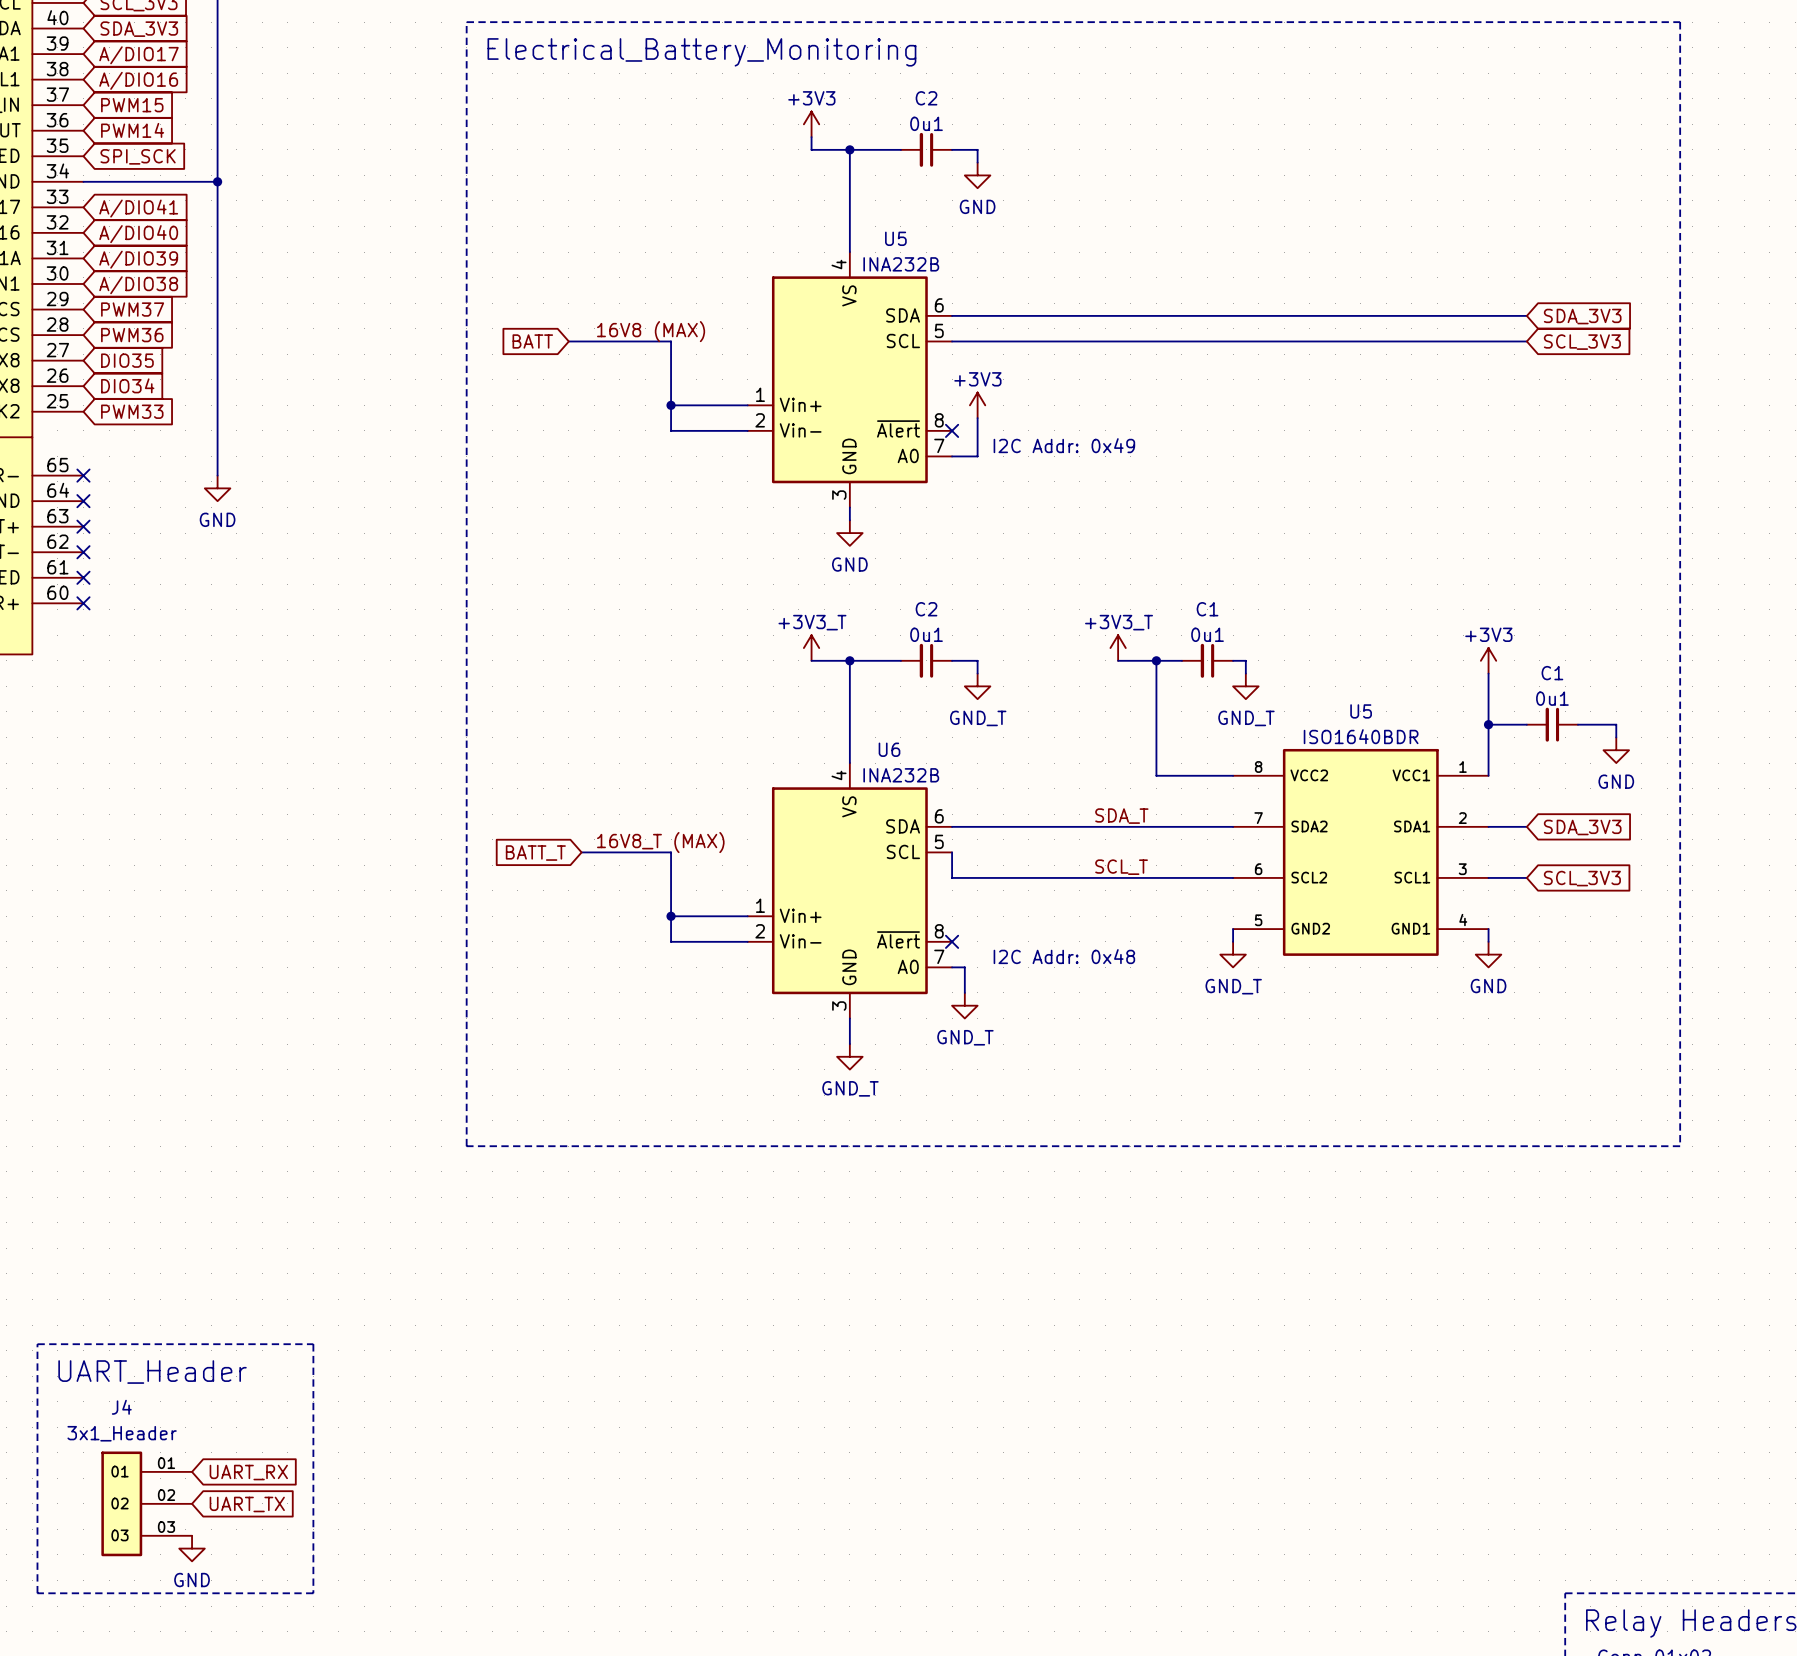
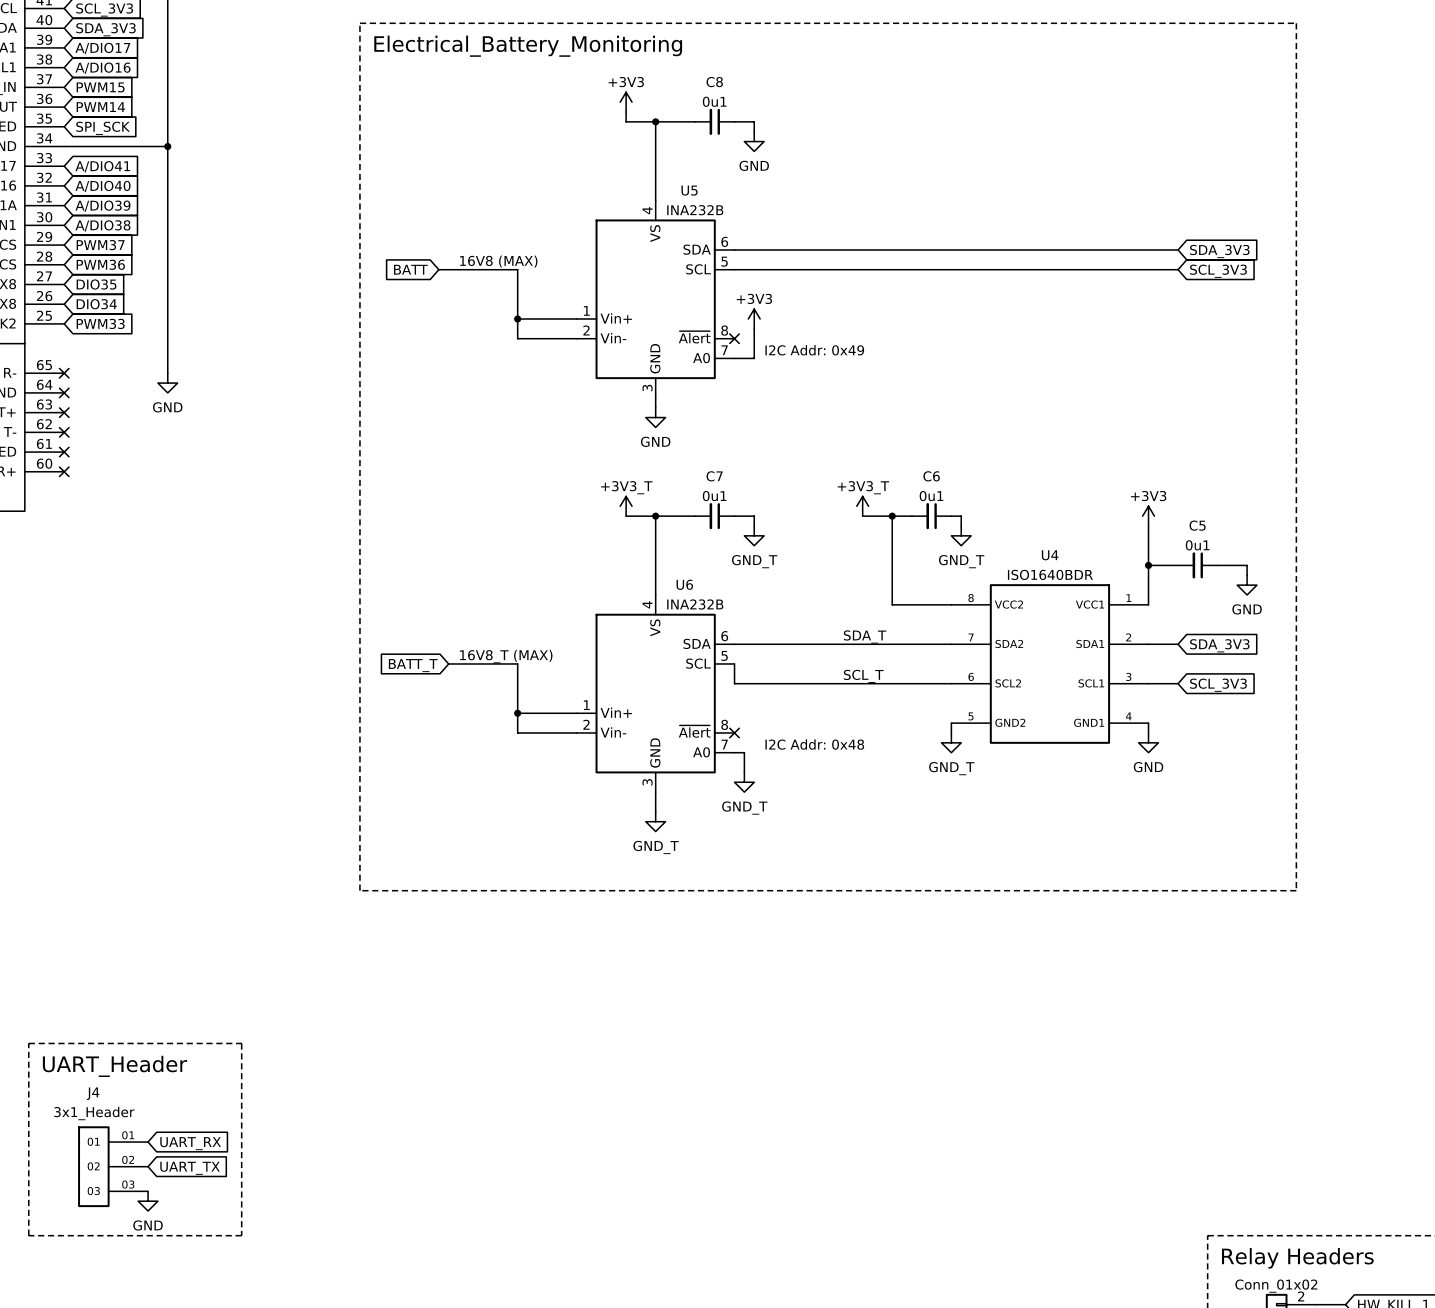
C2 name: C2 (926, 98) -> C8 (714, 82)
C2 name: C2 (926, 609) -> C7 (714, 476)
C1 name: C1 (1207, 609) -> C6 (931, 476)
C1 name: C1 (1552, 673) -> C5 (1197, 525)
U5 name: U5 (1361, 711) -> U4 (1050, 555)

